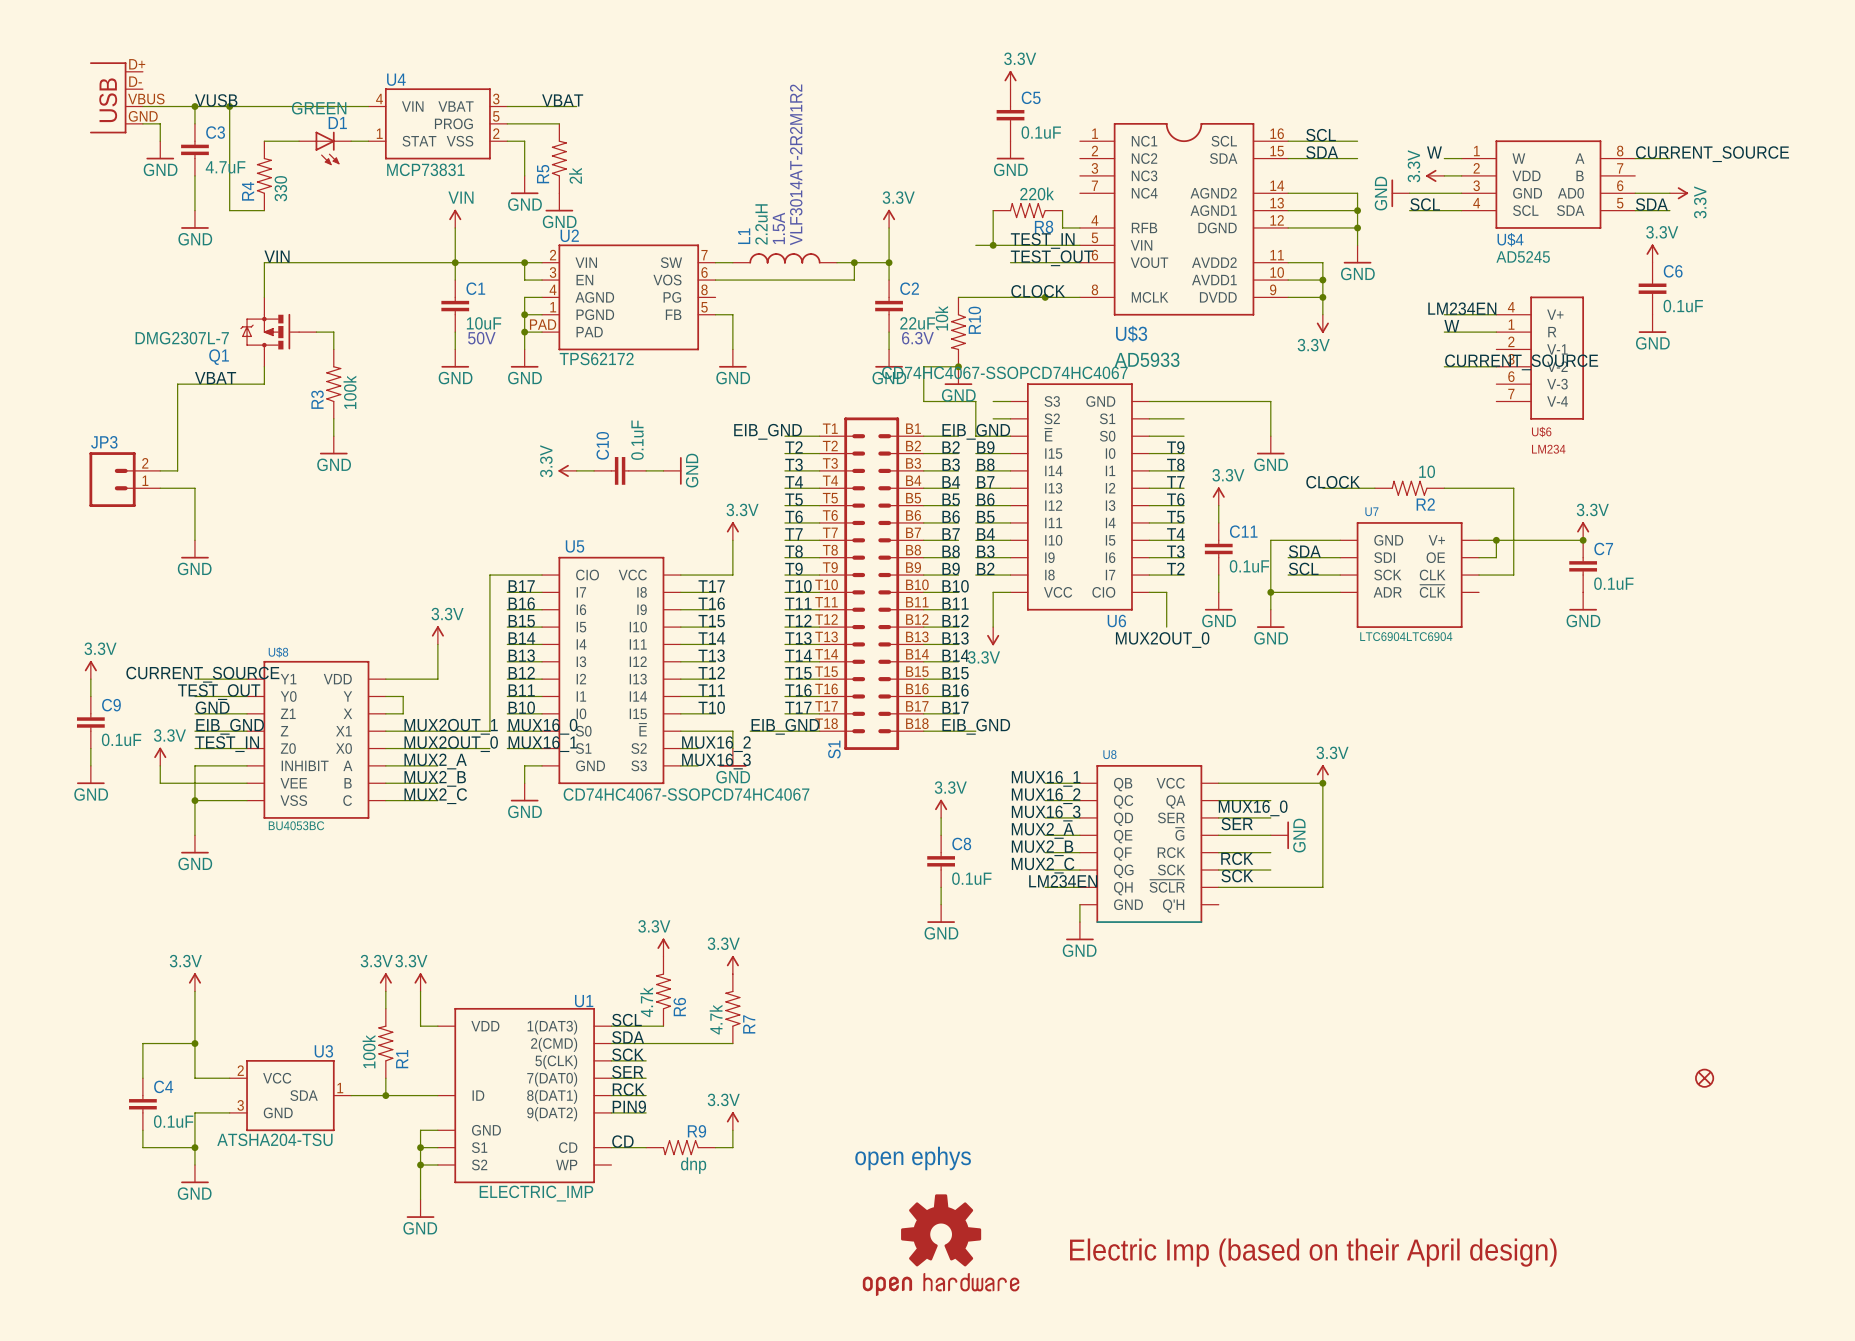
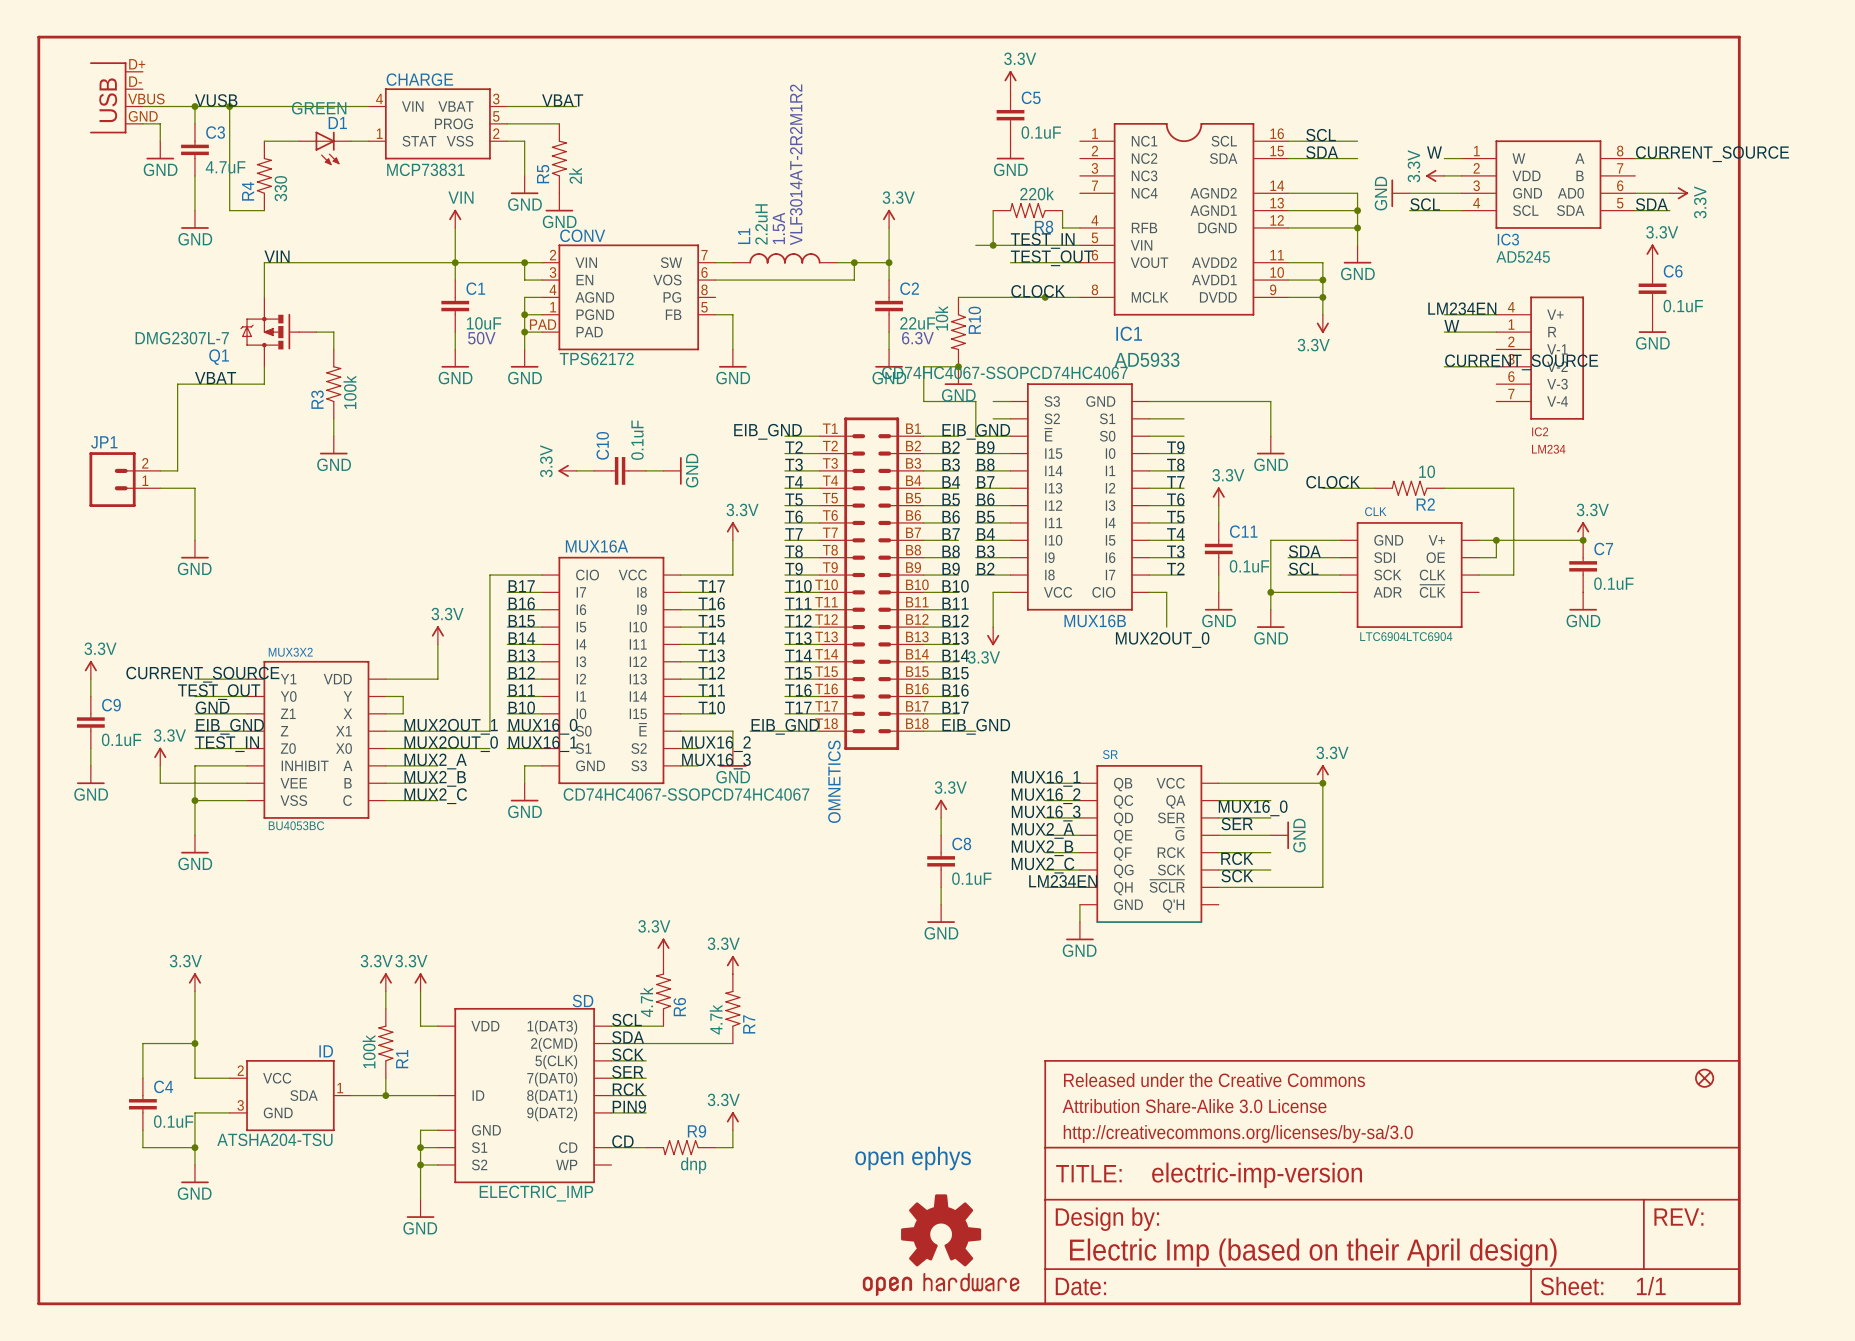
U4 name: U4 (396, 79) -> CHARGE (419, 79)
U2 name: U2 (569, 235) -> CONV (582, 235)
U$4 name: U$4 (1510, 239) -> IC3 (1508, 239)
U$3 name: U$3 (1131, 334) -> IC1 (1129, 333)
U$6 name: U$6 (1541, 431) -> IC2 (1540, 431)
JP3 name: JP3 (104, 442) -> JP1 (104, 442)
U7 name: U7 (1371, 511) -> CLK (1375, 511)
U5 name: U5 (575, 546) -> MUX16A (597, 546)
U6 name: U6 (1116, 621) -> MUX16B (1095, 621)
U$8 name: U$8 (278, 652) -> MUX3X2 (290, 652)
part: none -> (889, 670)
S1 name: S1 (834, 749) -> OMNETICS (834, 781)
U8 name: U8 (1109, 754) -> SR (1110, 754)
U1 name: U1 (584, 1001) -> SD (583, 1001)
U3 name: U3 (323, 1051) -> ID (326, 1051)
part: none -> (1392, 1182)

